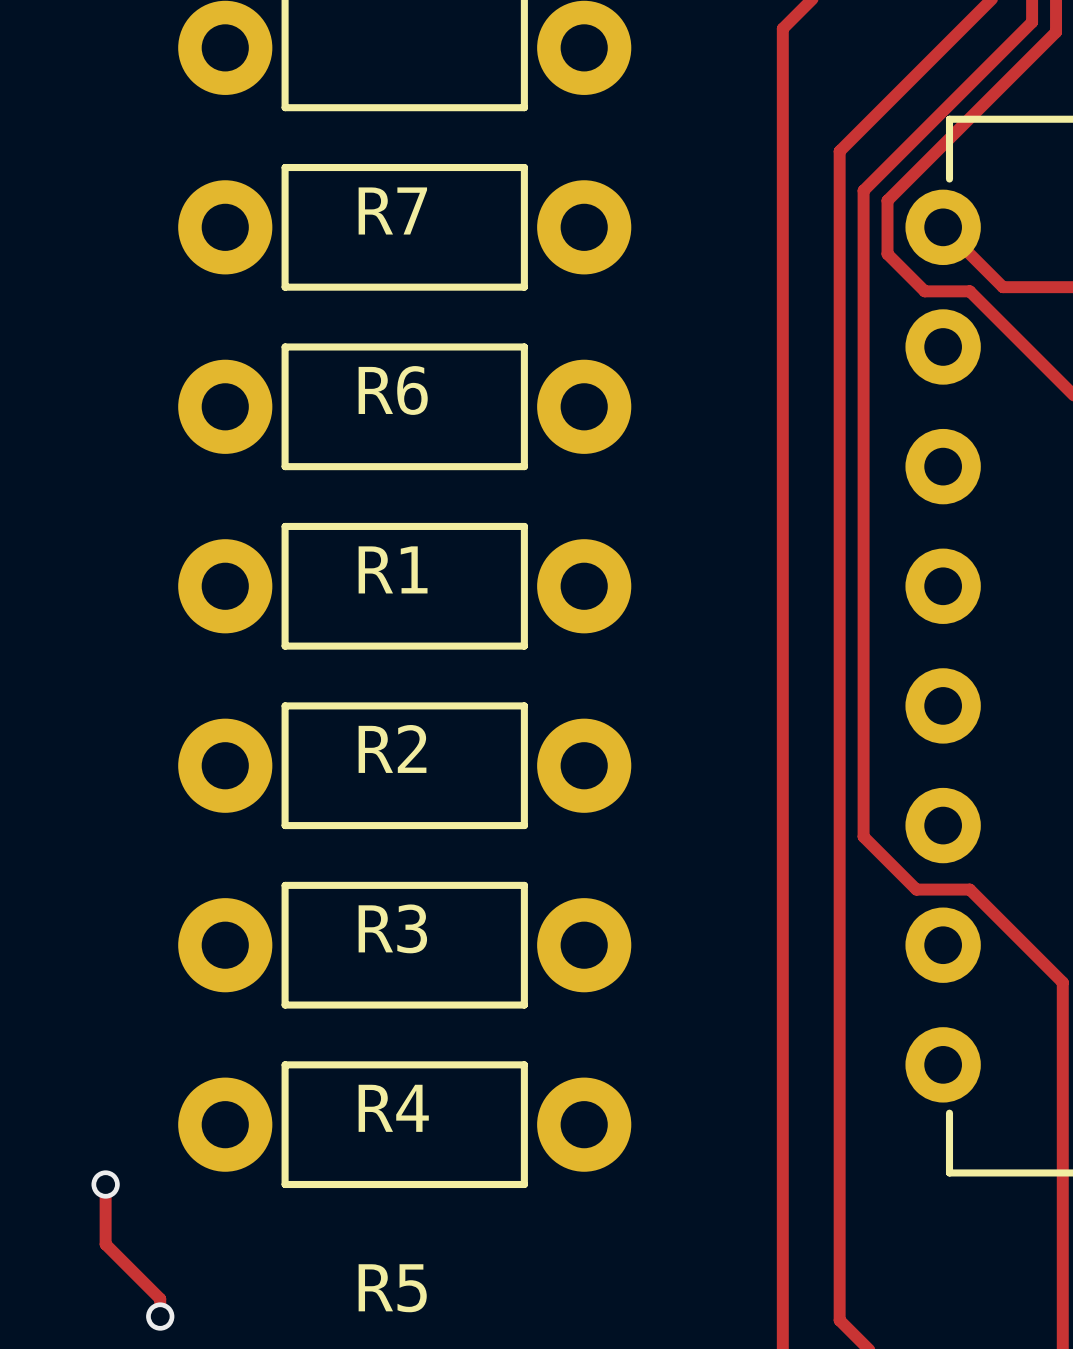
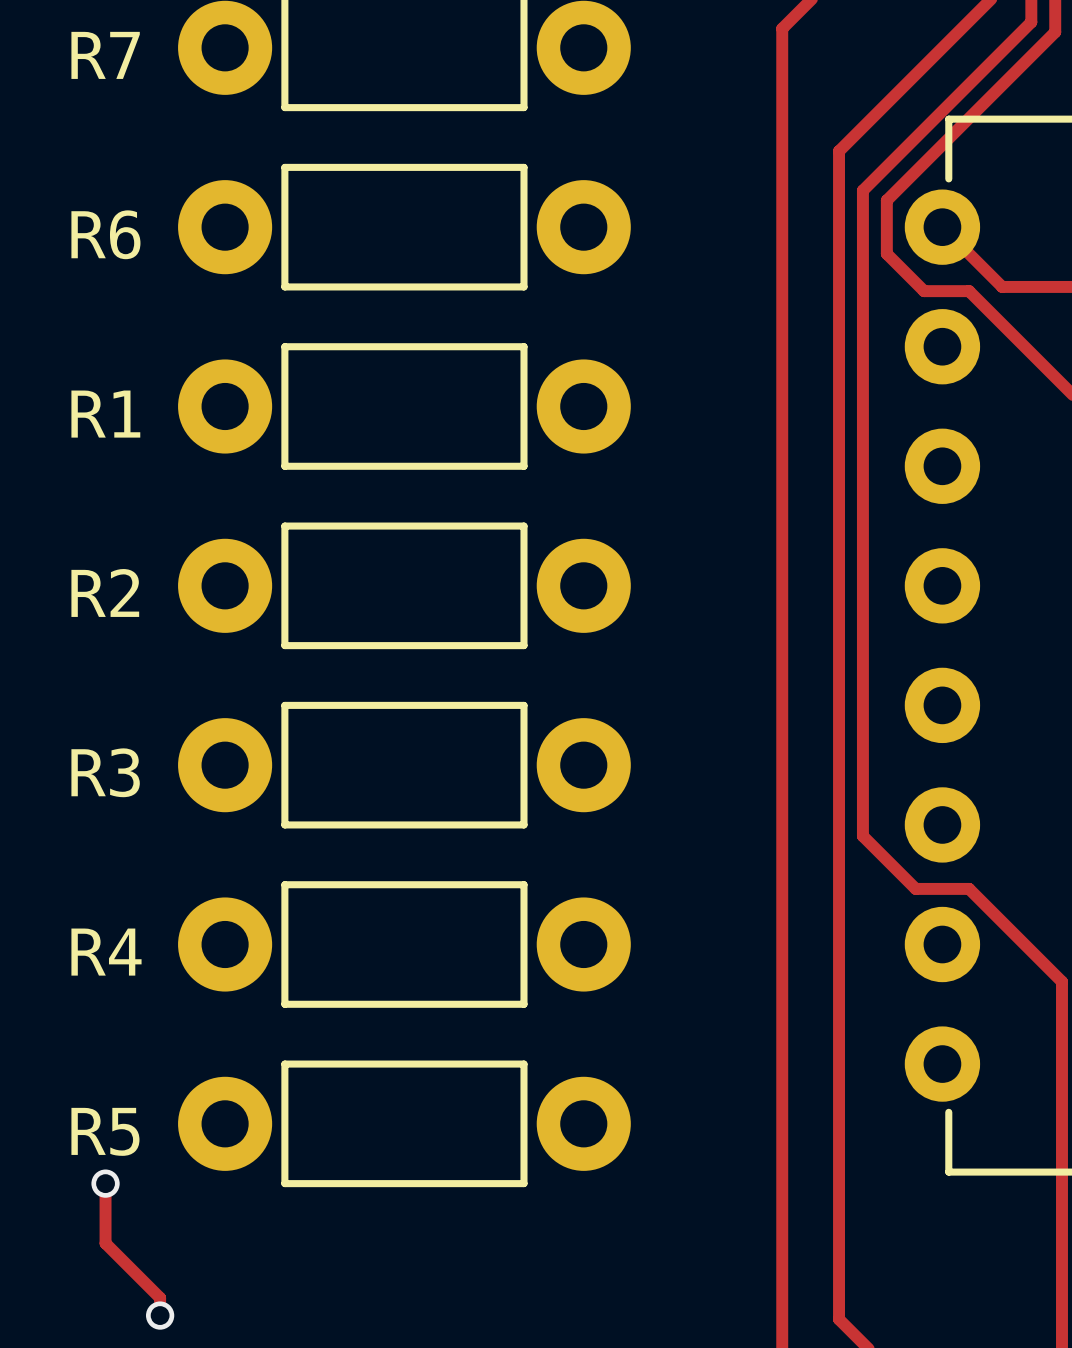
R7 name position: R7 (392, 210) -> R7 (105, 55)
R6 name position: R6 (393, 390) -> R6 (105, 234)
R1 name position: R1 (393, 569) -> R1 (105, 414)
R2 name position: R2 (392, 748) -> R2 (105, 592)
R3 name position: R3 (392, 928) -> R3 (105, 772)
R4 name position: R4 (393, 1108) -> R4 (106, 952)
R5 name position: R5 (392, 1288) -> R5 (105, 1131)

